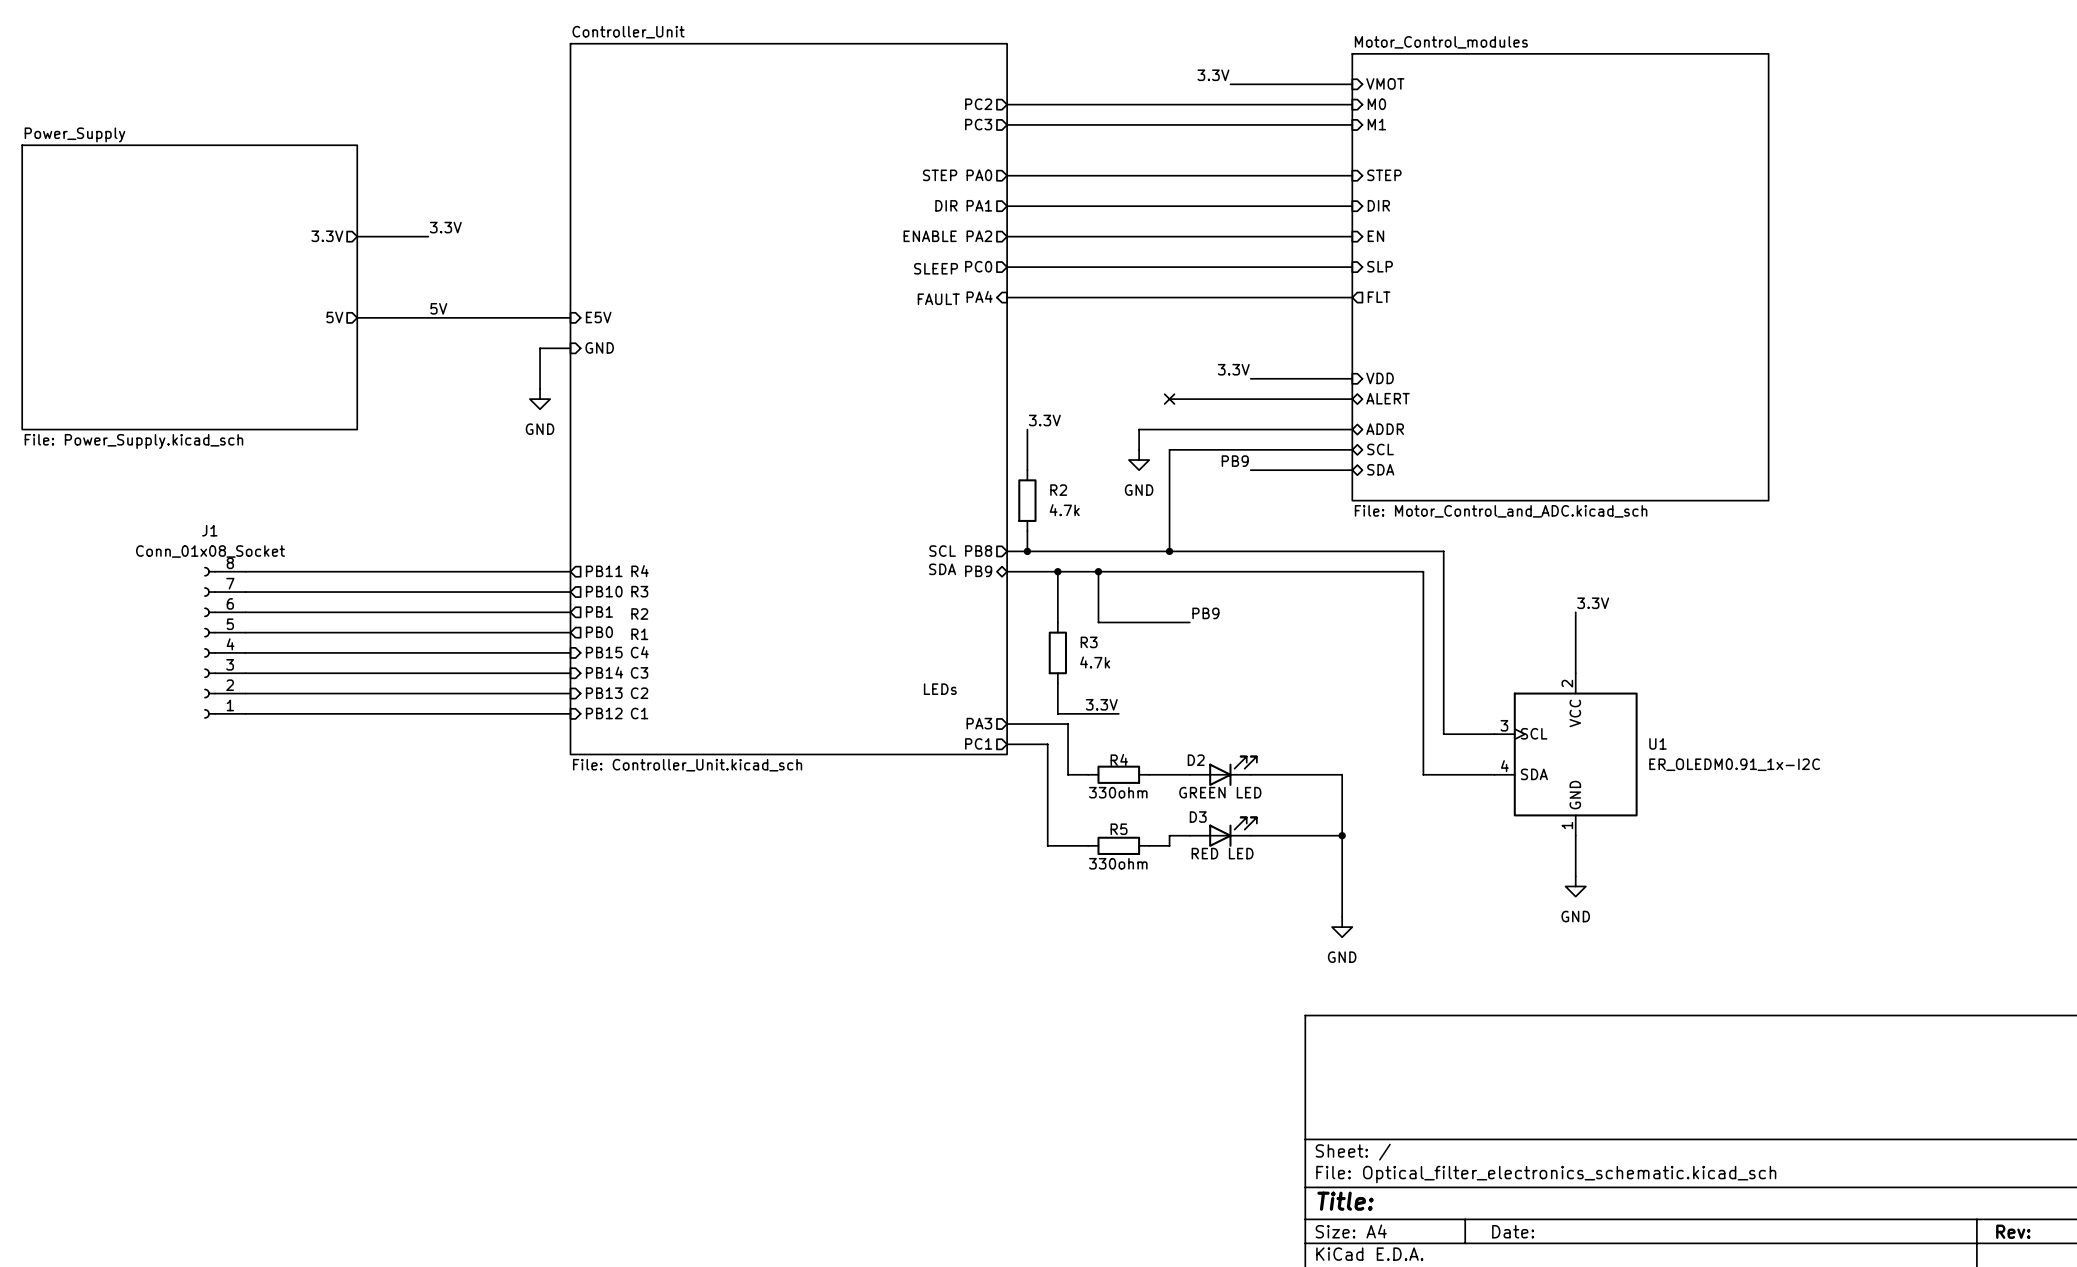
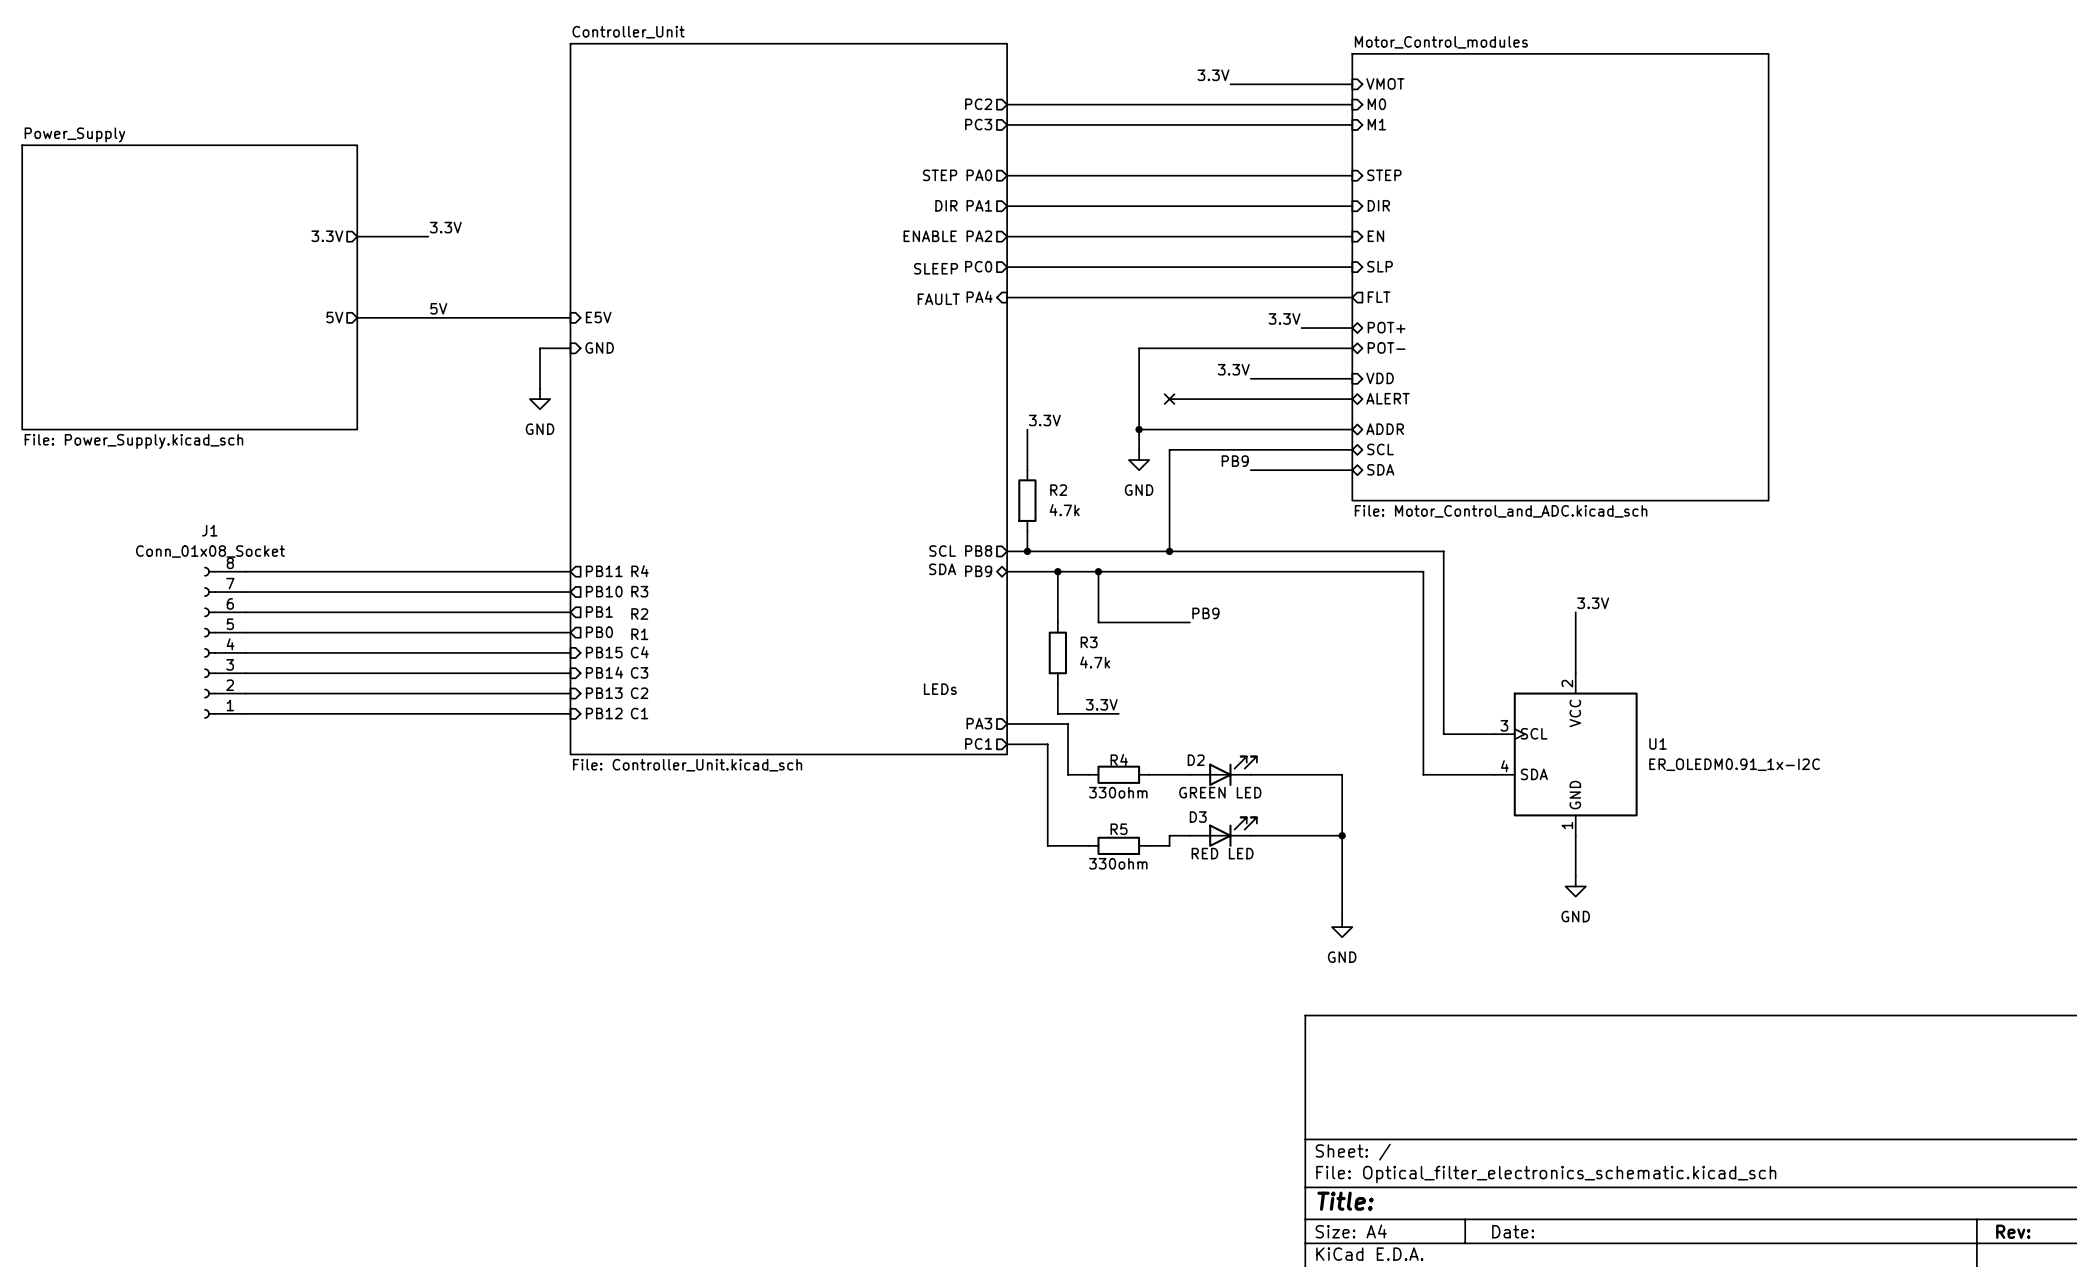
label: none -> 3.3V (1284, 318)
sheet pin: none -> POT+ (1386, 327)
wire: none -> (1301, 328) (1352, 328)
sheet pin: none -> POT- (1386, 347)
wire: none -> (1352, 348) (1139, 348) (1139, 429)
junction: none -> (1139, 429)

